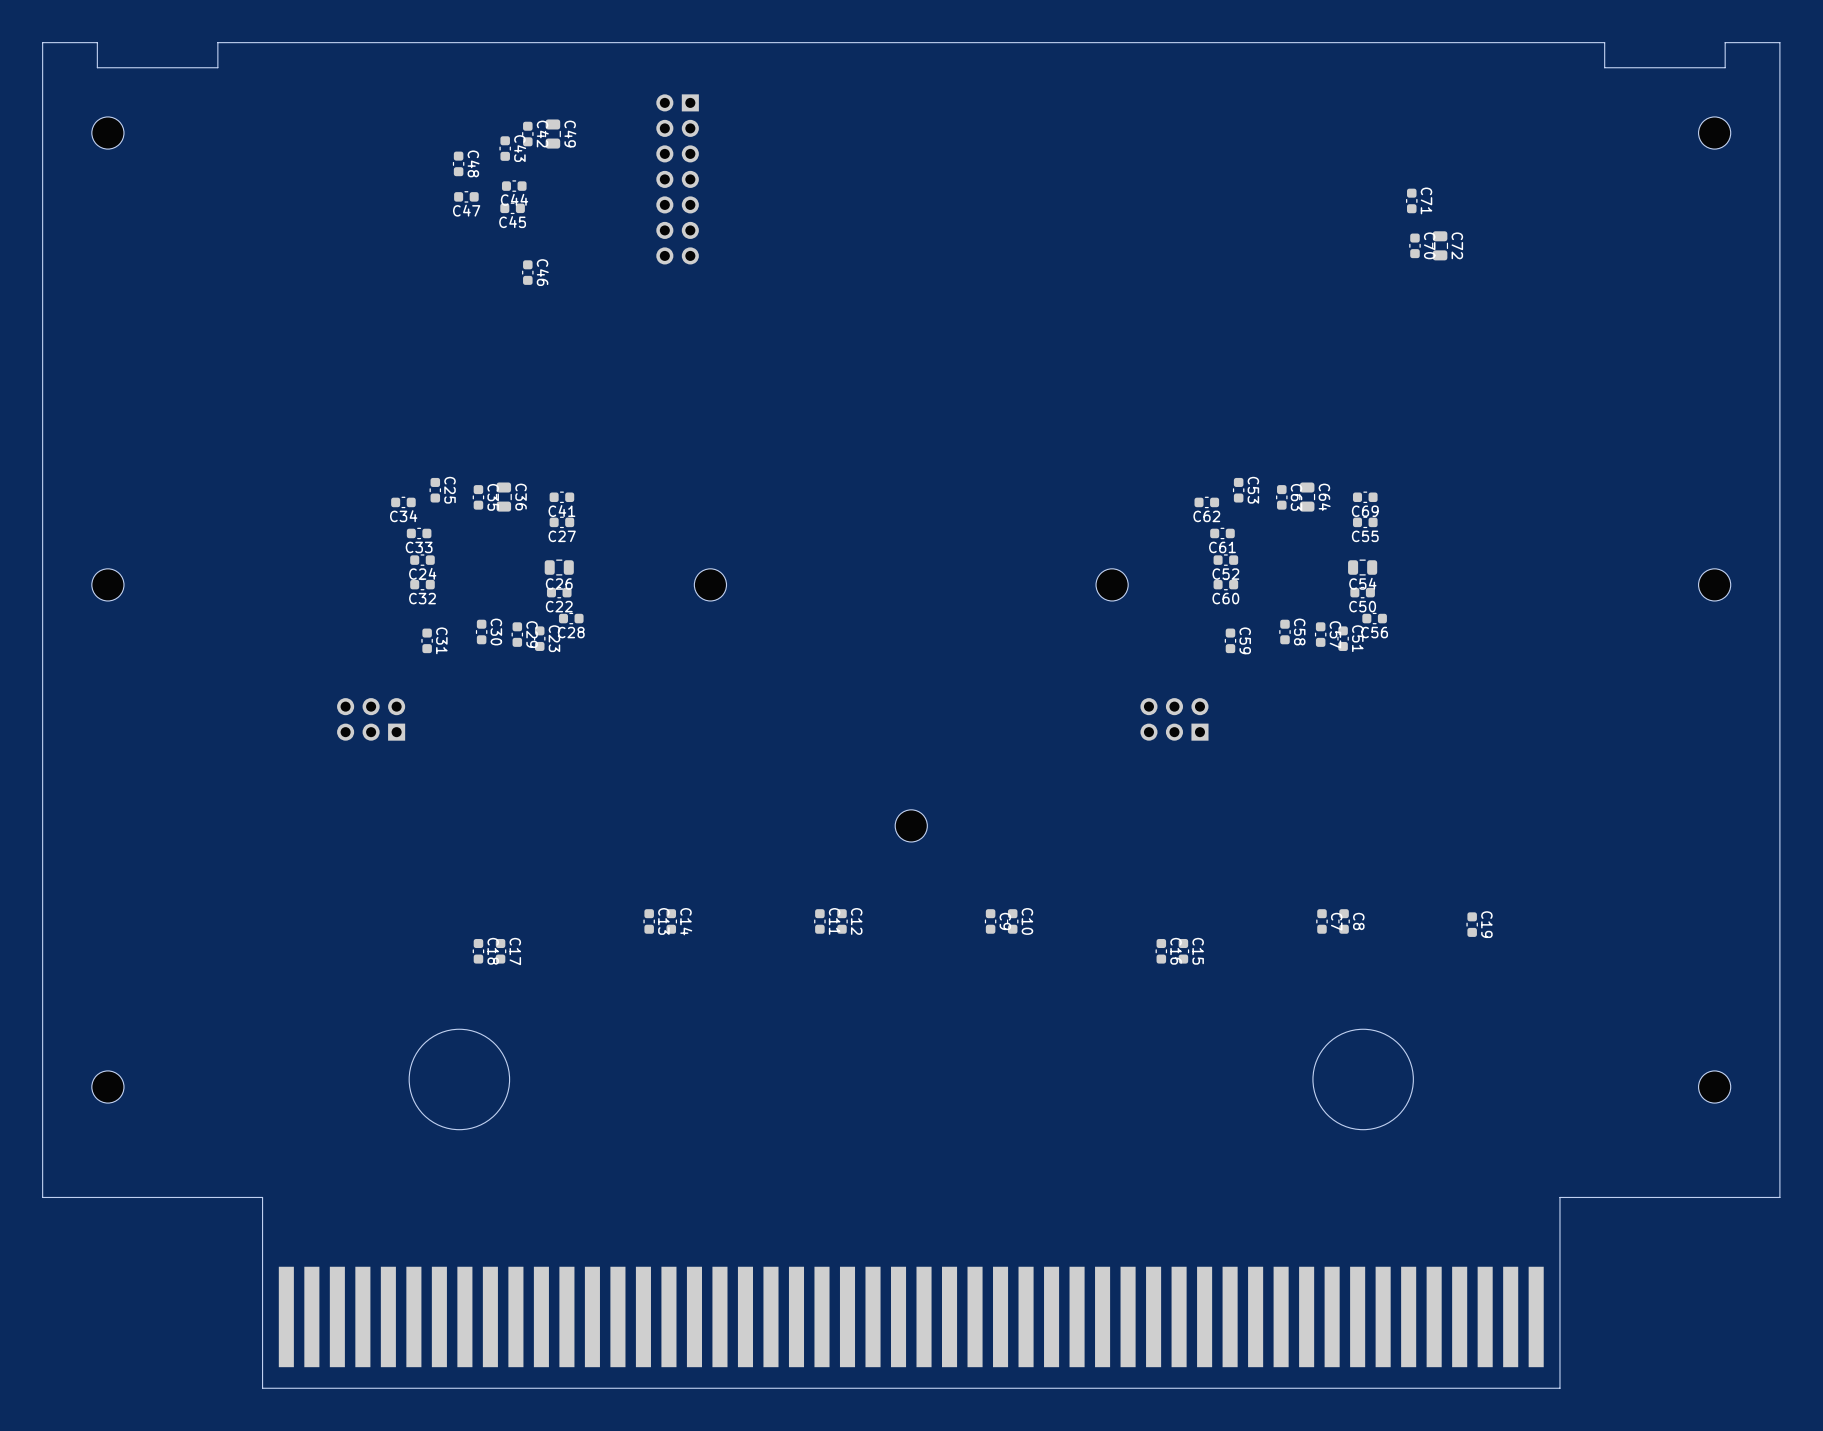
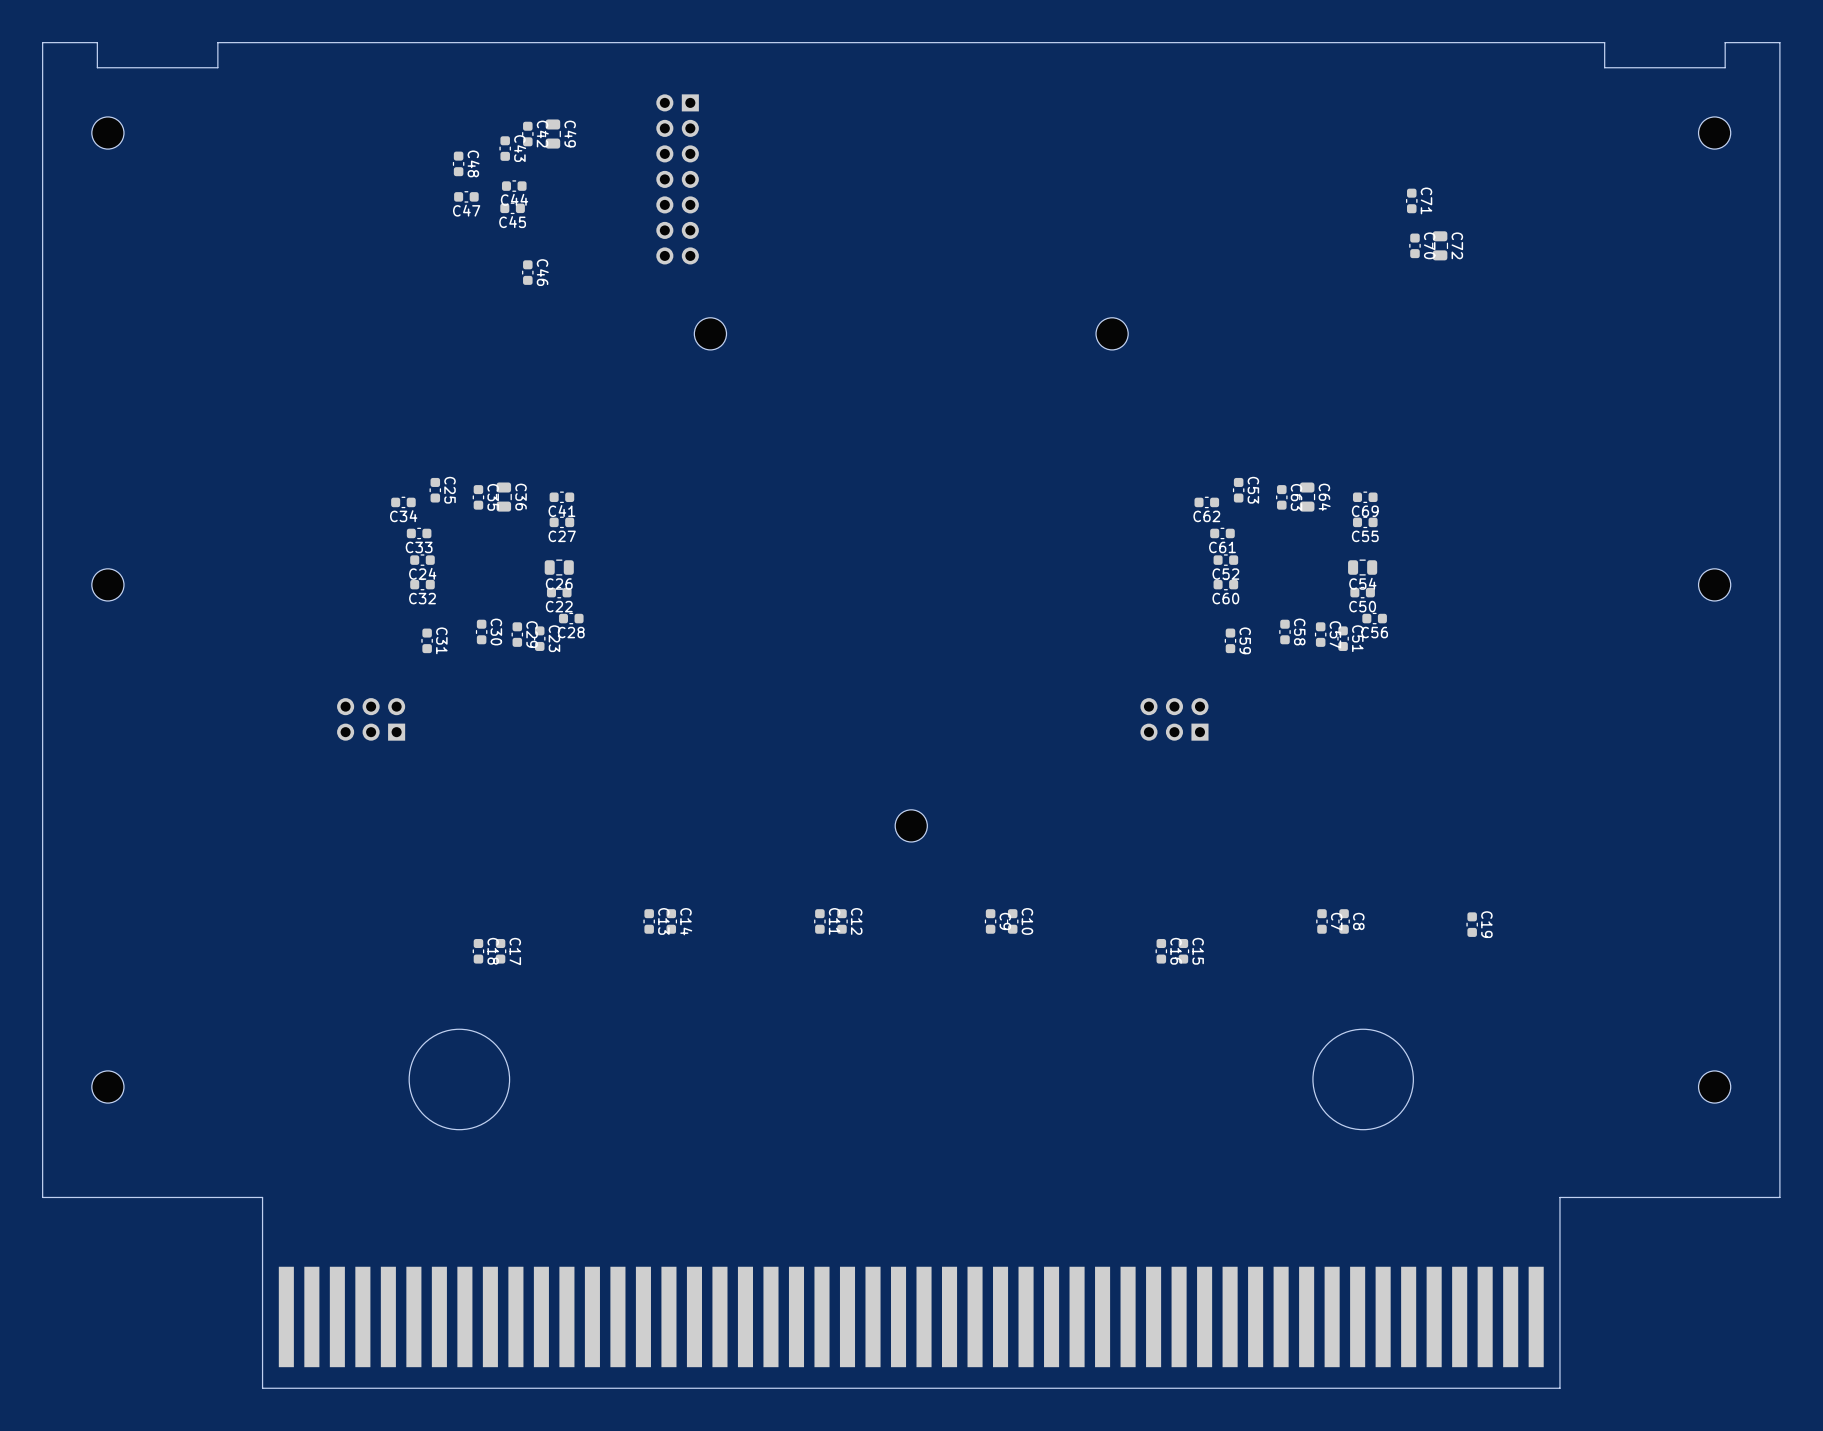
part: none -> (710, 333)
part: none -> (1112, 333)
part: (710, 584) -> none
part: (1112, 584) -> none

